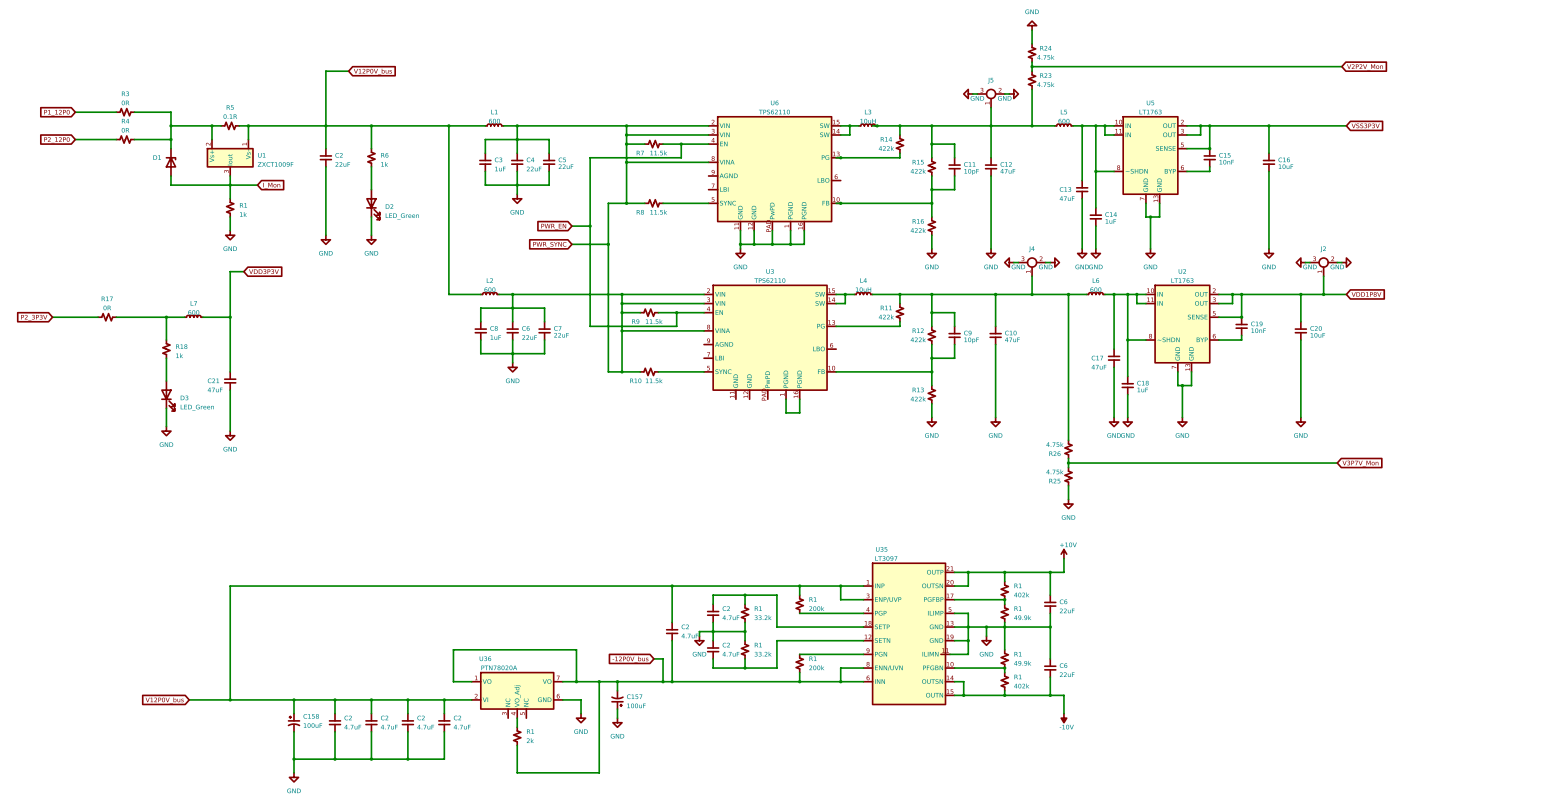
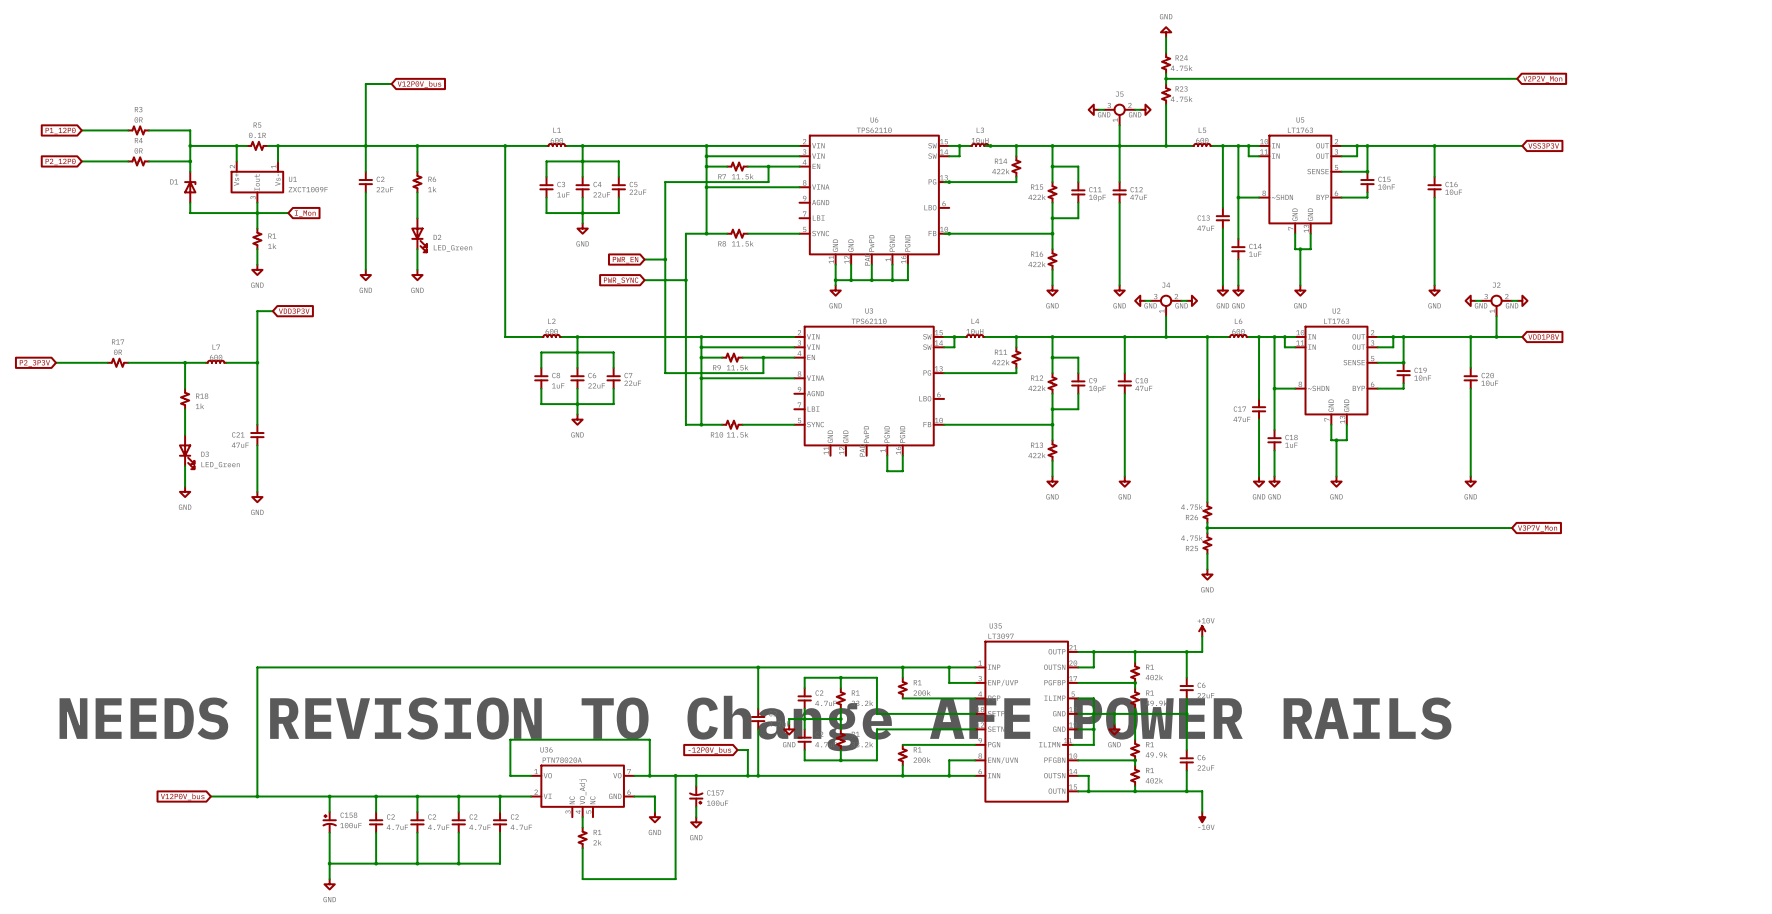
text: none -> NEEDS REVISION TO Change AFE POWER RAILS (755, 723)

